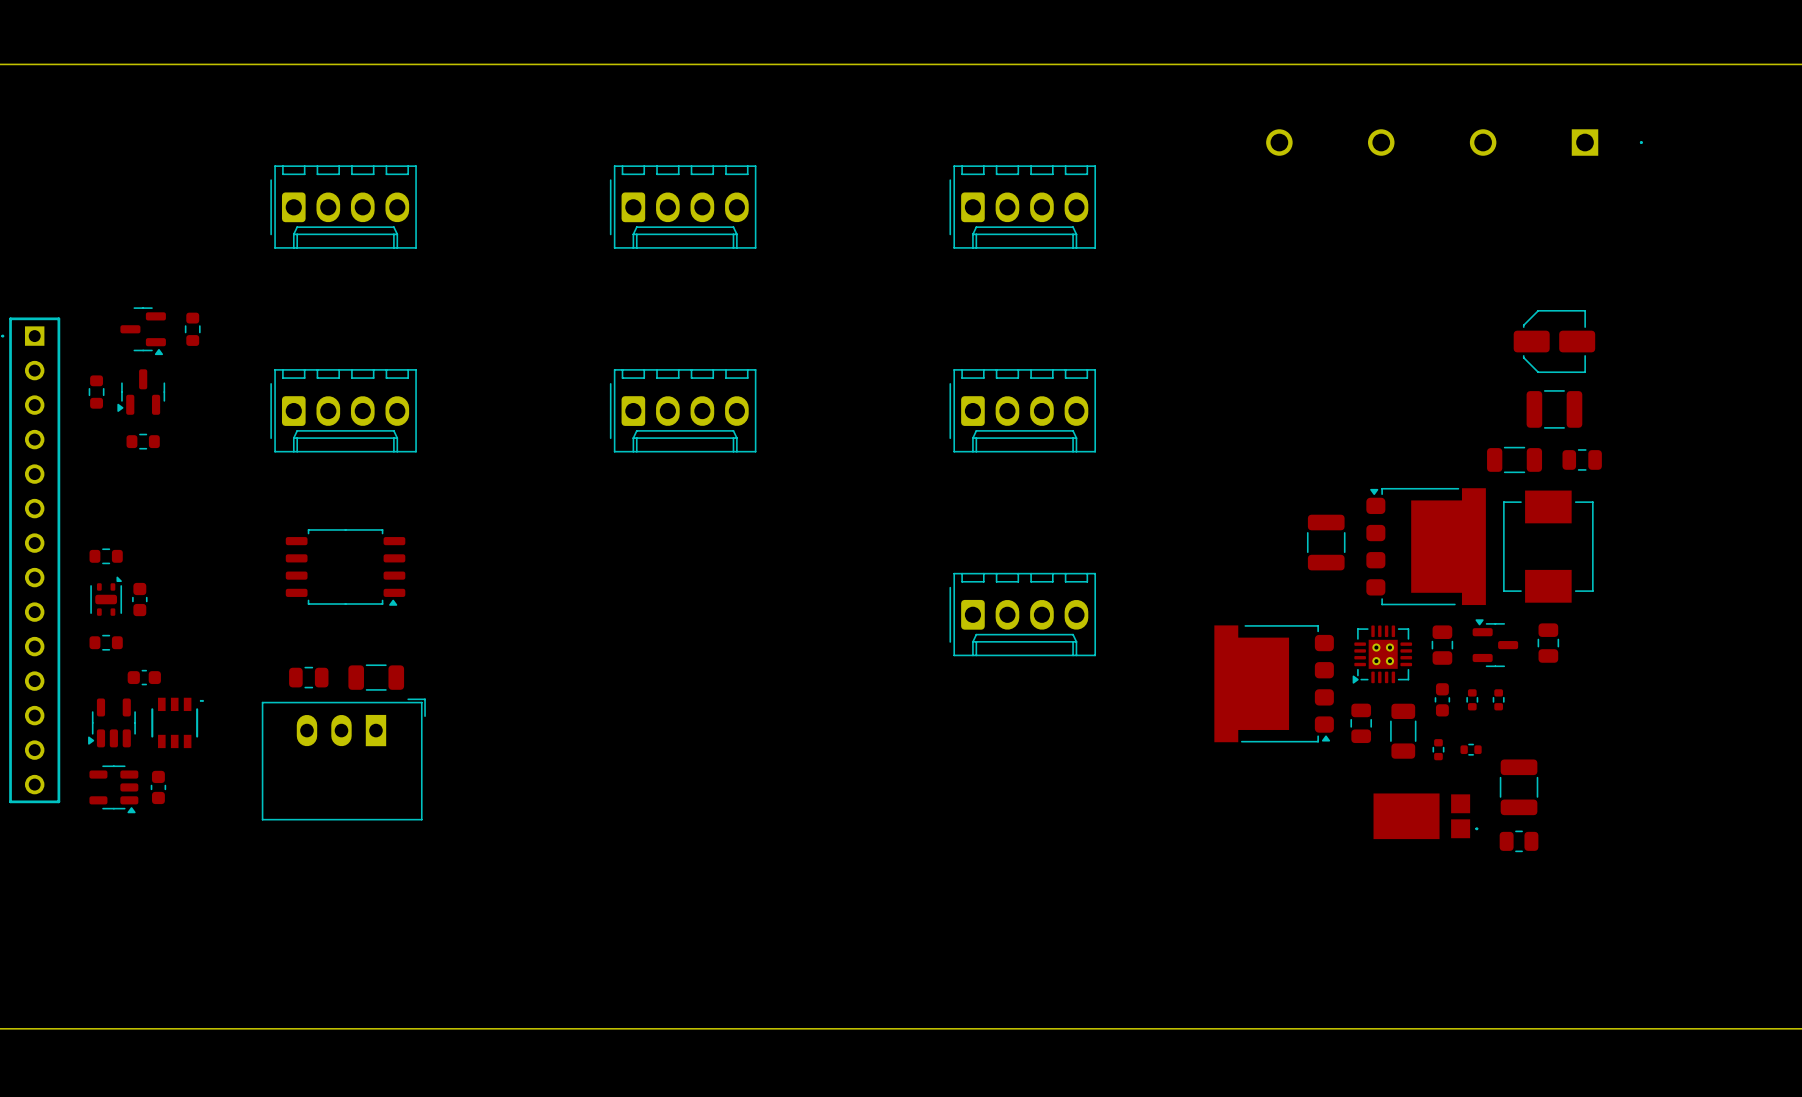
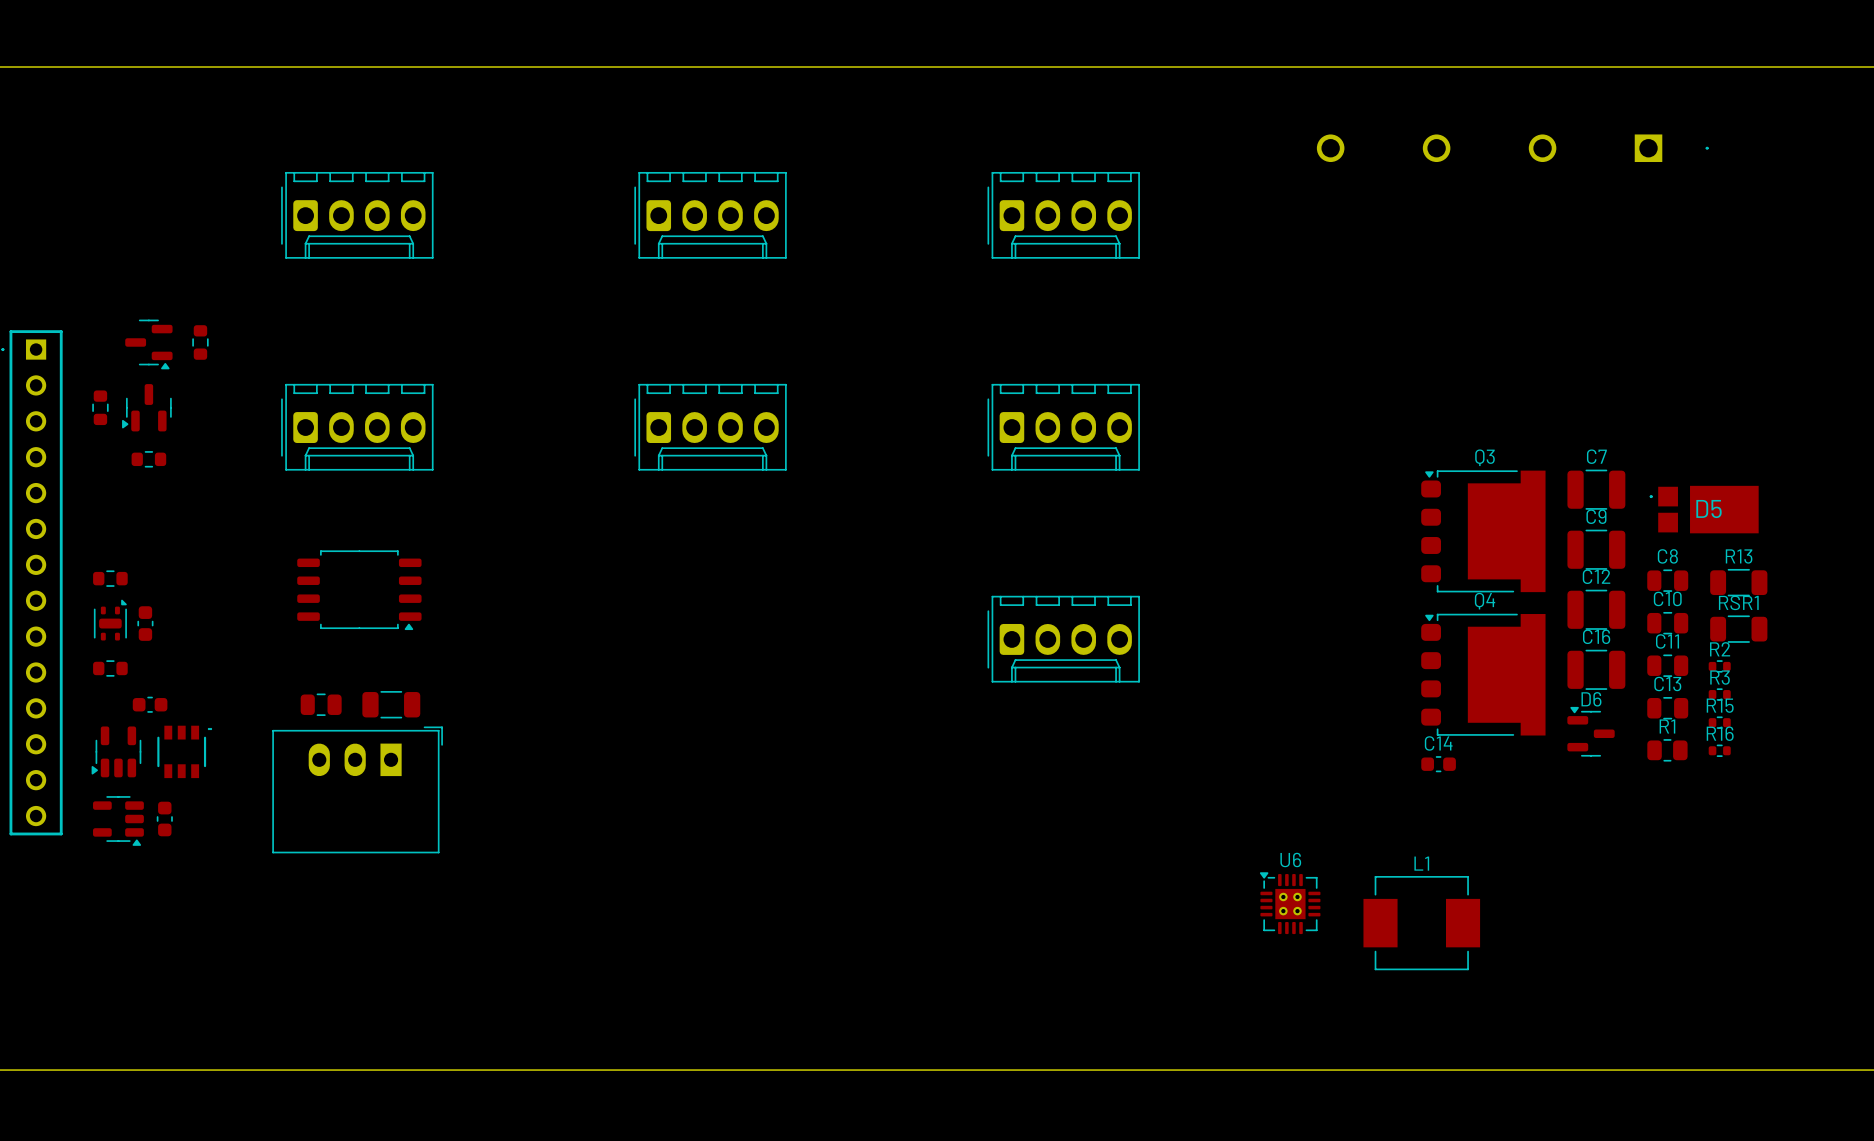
part: (1554, 341) -> none
part: (1554, 409) -> none
part: (1514, 459) -> none
part: (1582, 459) -> none
C7: none -> (1596, 489)
D5: none -> (1704, 509)
Q3: none -> (1483, 531)
C9: none -> (1596, 549)
part: (1326, 542) -> none
part: (1426, 546) -> none
part: (1548, 546) -> none
C8: none -> (1667, 580)
R13: none -> (1738, 582)
C12: none -> (1596, 609)
C10: none -> (1667, 623)
RSR1: none -> (1738, 629)
C11: none -> (1667, 665)
R2: none -> (1719, 666)
part: (1495, 643) -> none
part: (1548, 643) -> none
C16: none -> (1596, 669)
part: (1442, 645) -> none
Q4: none -> (1483, 674)
part: (1382, 654) -> none
R3: none -> (1719, 694)
C13: none -> (1667, 708)
part: (1274, 683) -> none
R15: none -> (1719, 722)
part: (1442, 699) -> none
part: (1472, 699) -> none
part: (1498, 699) -> none
D6: none -> (1591, 731)
R1: none -> (1667, 750)
R16: none -> (1719, 750)
part: (1361, 723) -> none
part: (1403, 731) -> none
C14: none -> (1438, 764)
part: (1438, 749) -> none
part: (1471, 749) -> none
part: (1519, 787) -> none
part: (1425, 816) -> none
part: (1519, 841) -> none
U6: none -> (1290, 903)
L1: none -> (1421, 923)

